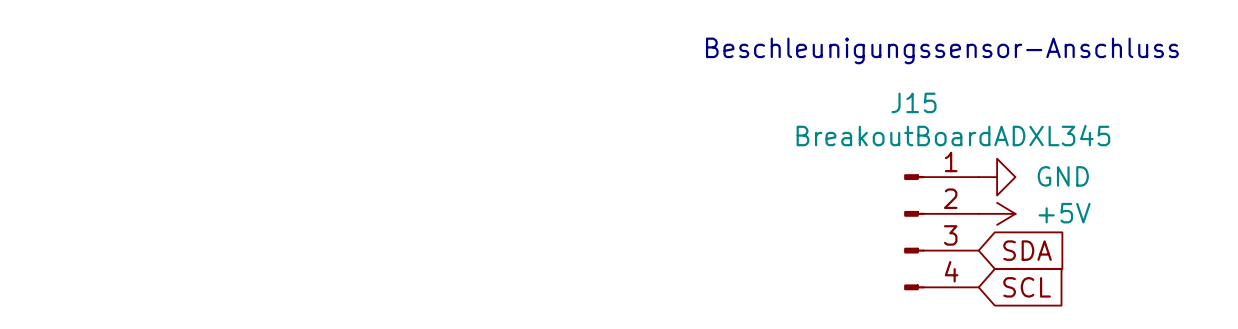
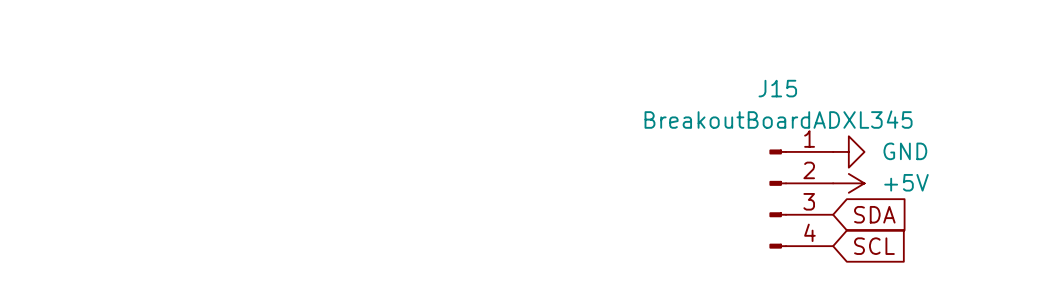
text: Beschleunigungssensor-Anschluss (942, 50) -> none
J15 value position: BreakoutBoardADXL345 (953, 135) -> BreakoutBoardADXL345 (778, 119)

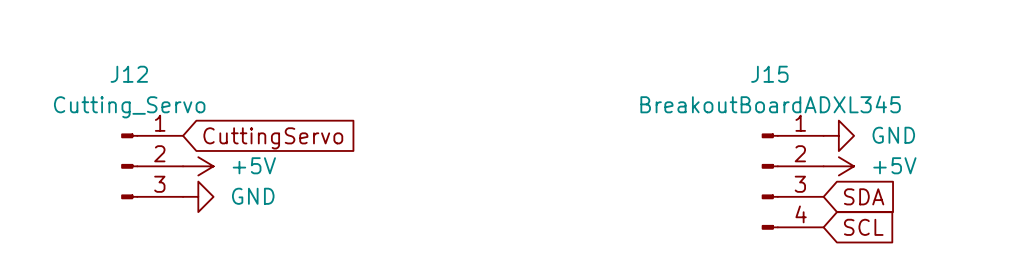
global label: none -> CuttingServo (273, 138)
J12: none -> Cutting_Servo (152, 166)
power symbol: none -> +5V (198, 166)
power symbol: none -> GND (198, 196)

